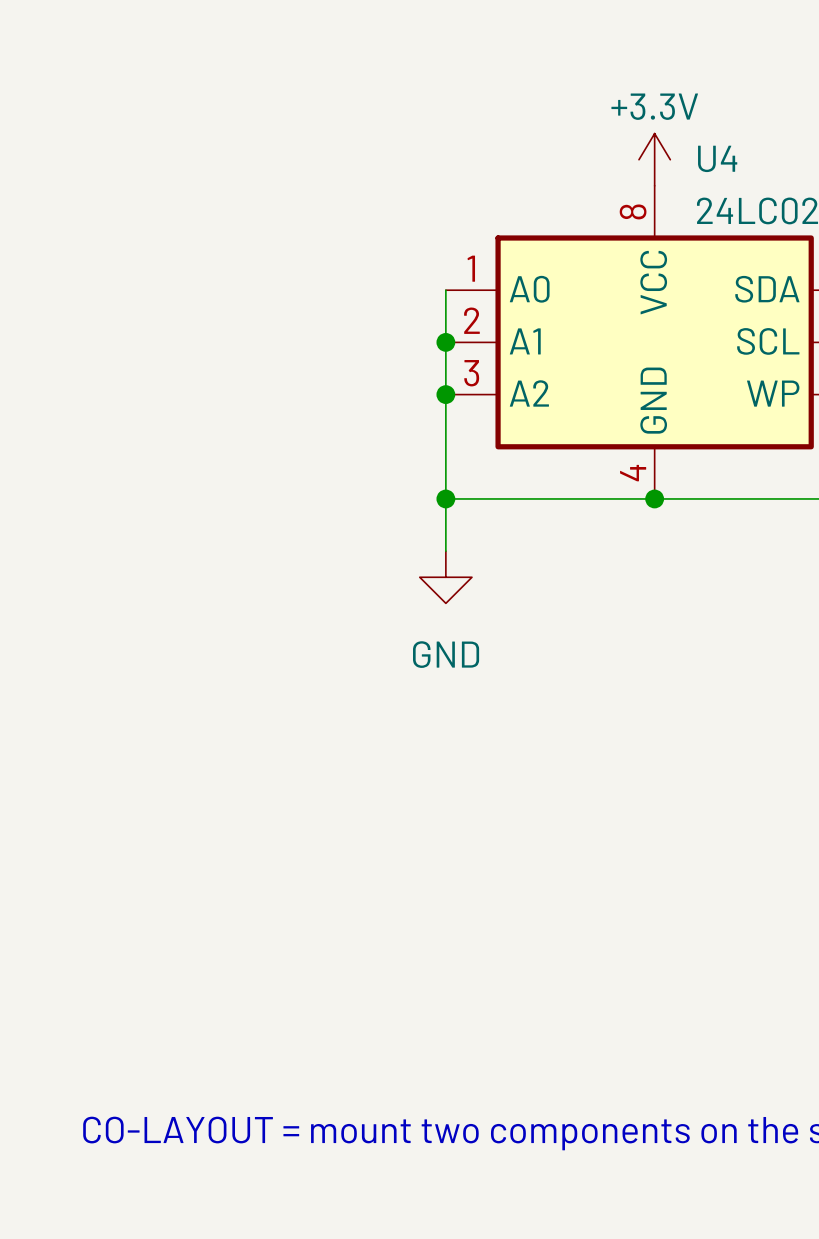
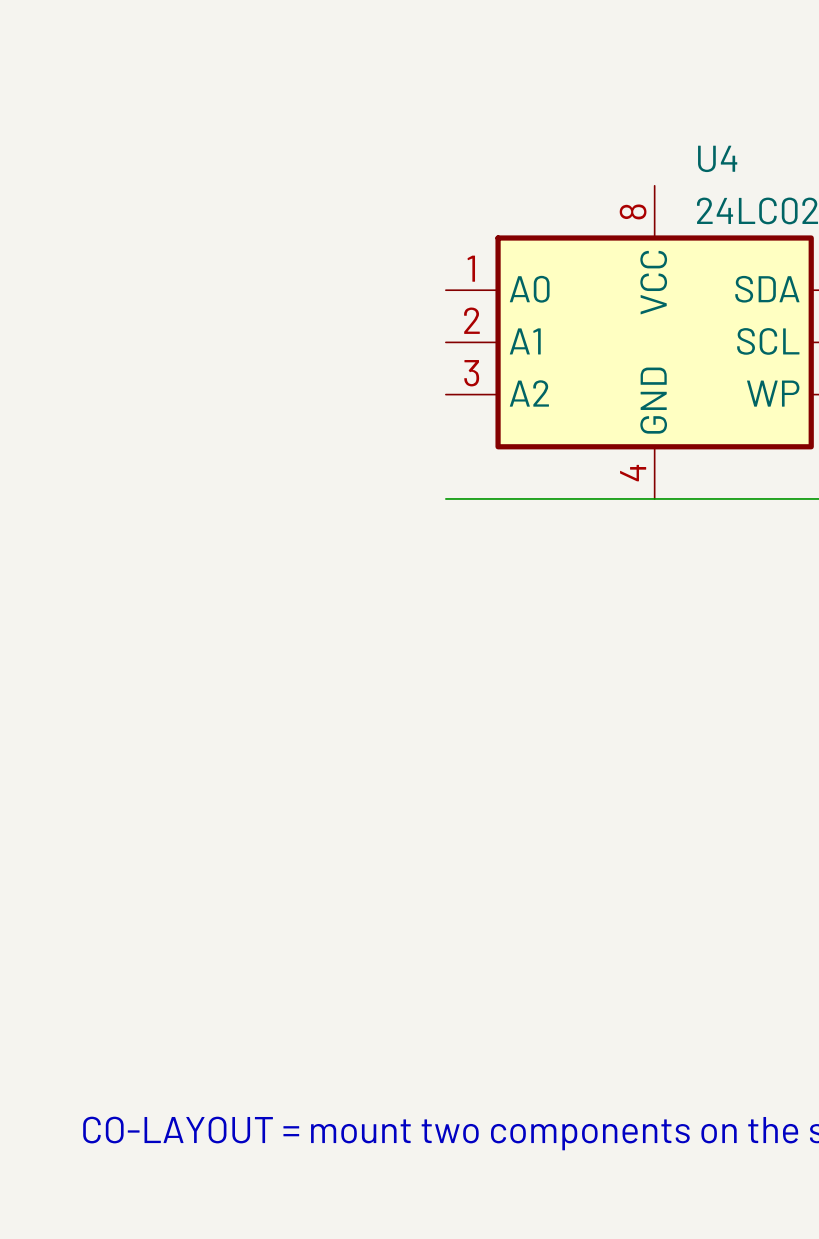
power symbol: +3.3V (654, 159) -> none
wire: (445, 290) (445, 551) -> none
junction: (445, 342) -> none
junction: (445, 394) -> none
junction: (445, 498) -> none
junction: (654, 498) -> none
power symbol: GND (445, 577) -> none

